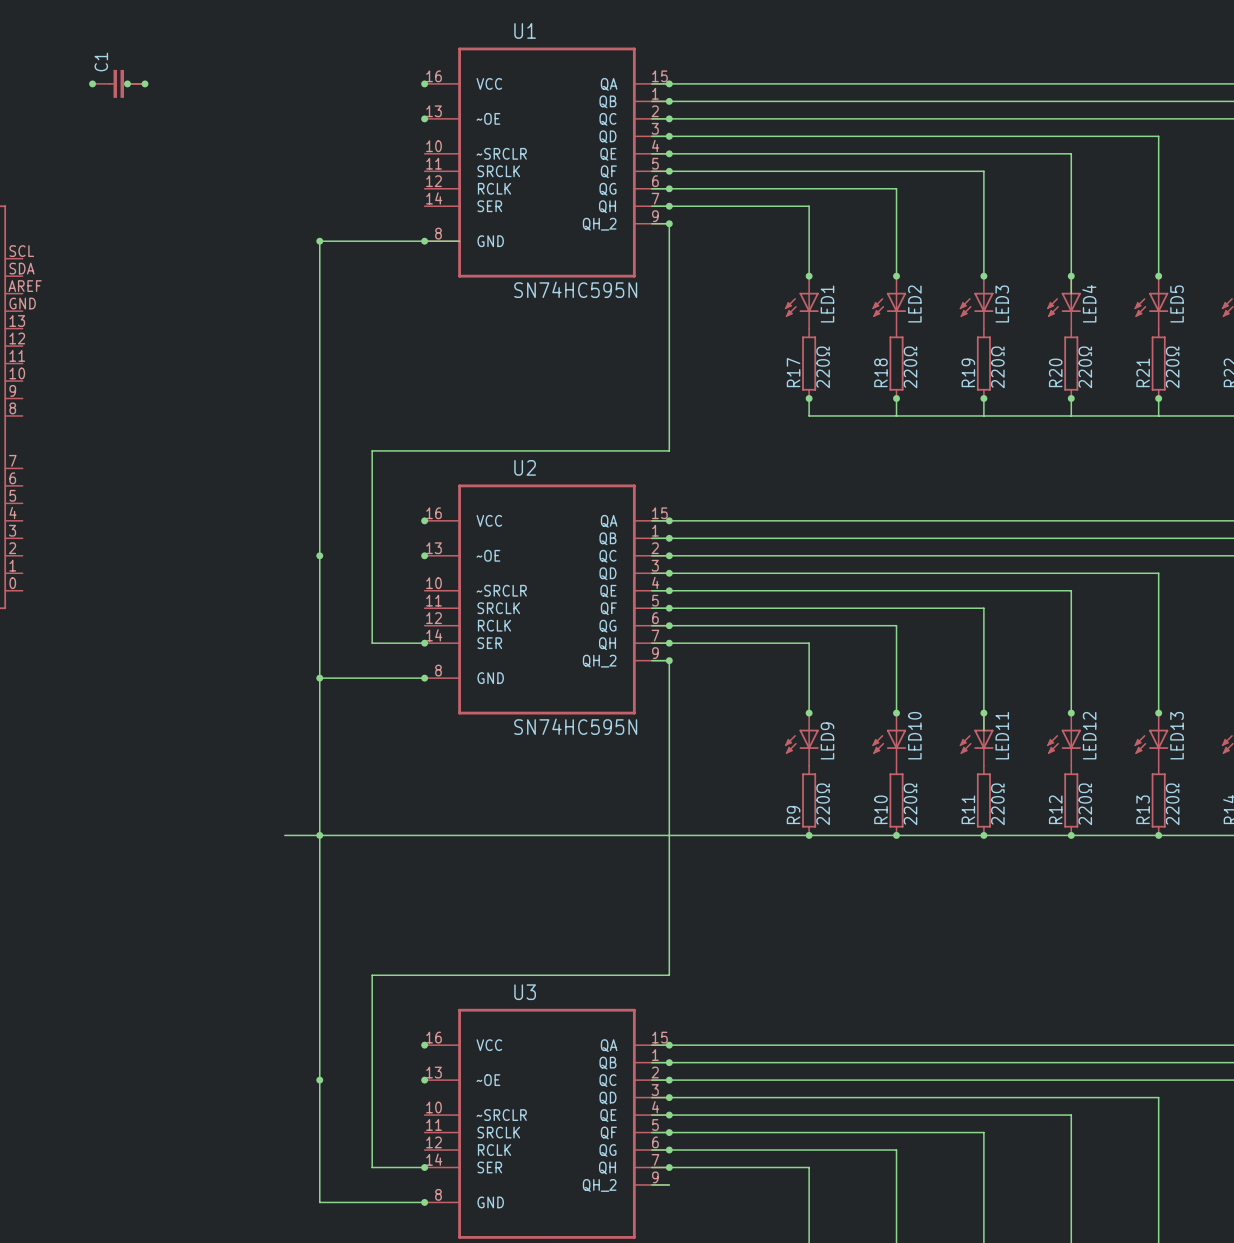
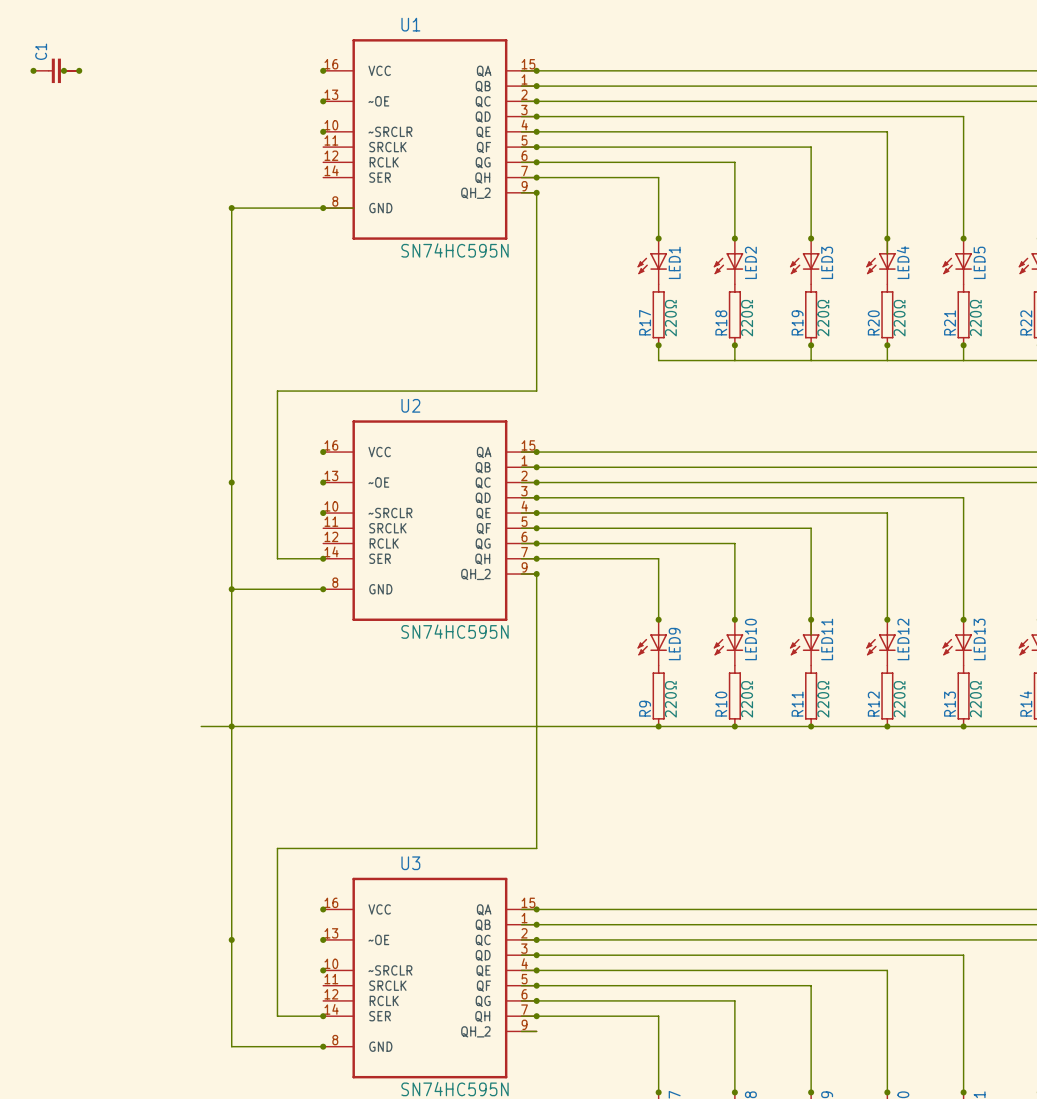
junction: none -> (323, 131)
junction: none -> (323, 513)
junction: none -> (323, 970)

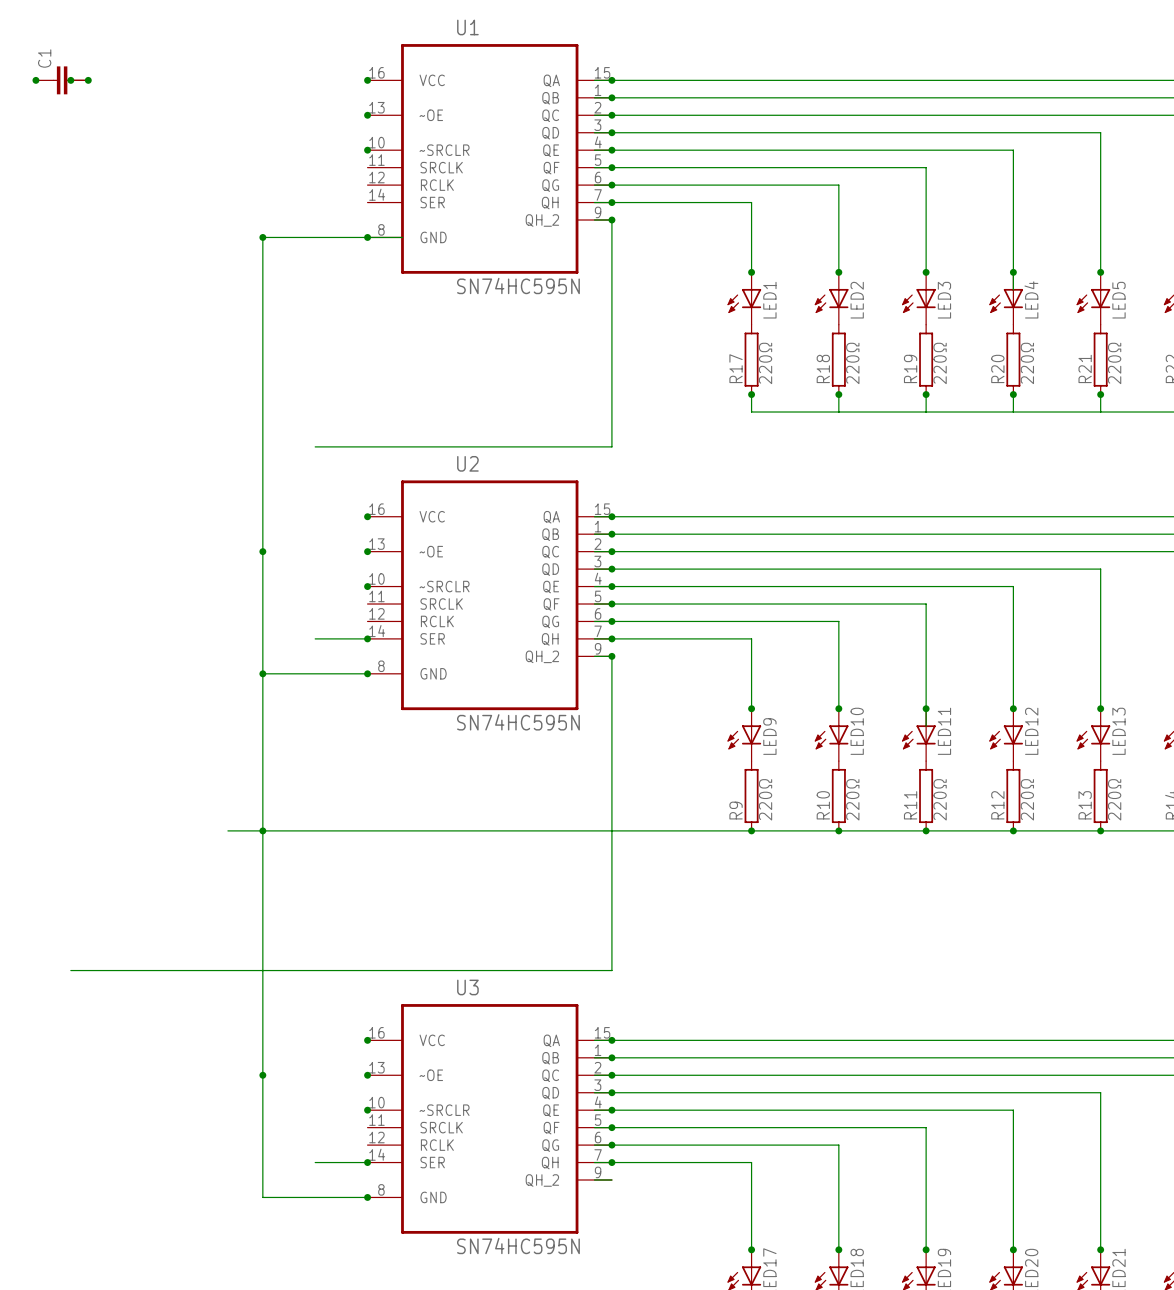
wire: (277, 391) (277, 558) -> none
wire: (277, 848) (277, 1016) -> (315, 970) (70, 970)

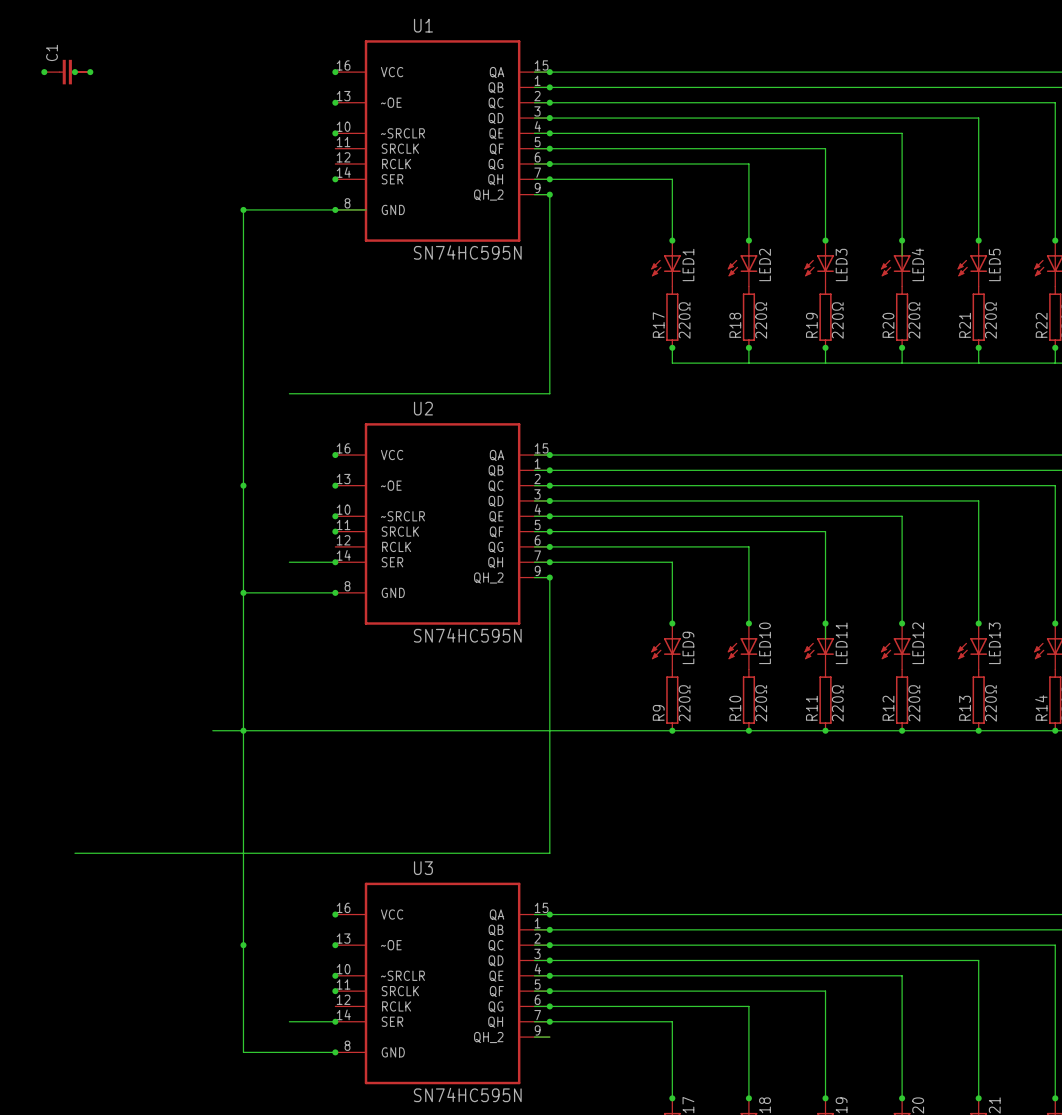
junction: none -> (335, 179)
junction: none -> (335, 531)
junction: none -> (335, 991)

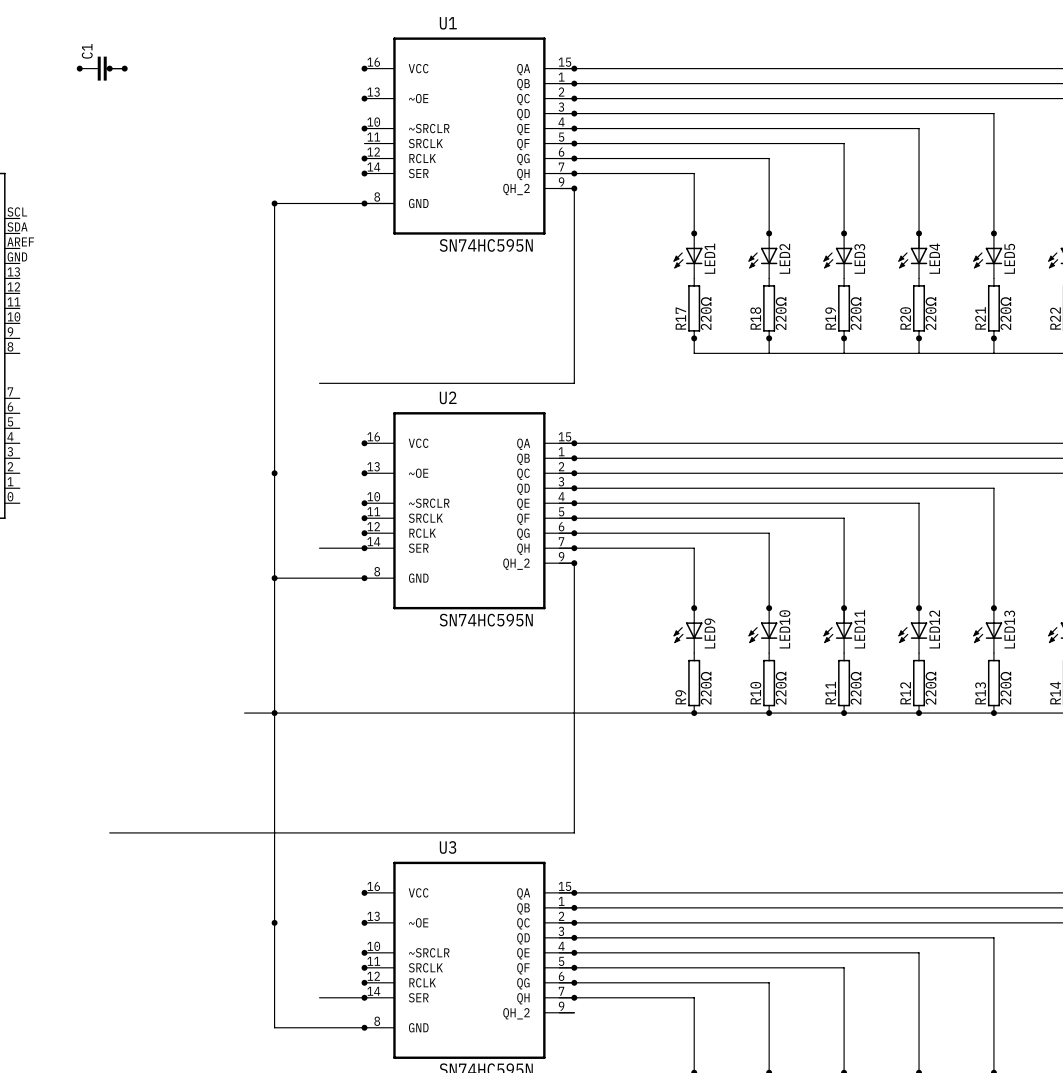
junction: none -> (364, 158)
junction: none -> (364, 533)
junction: none -> (364, 982)

